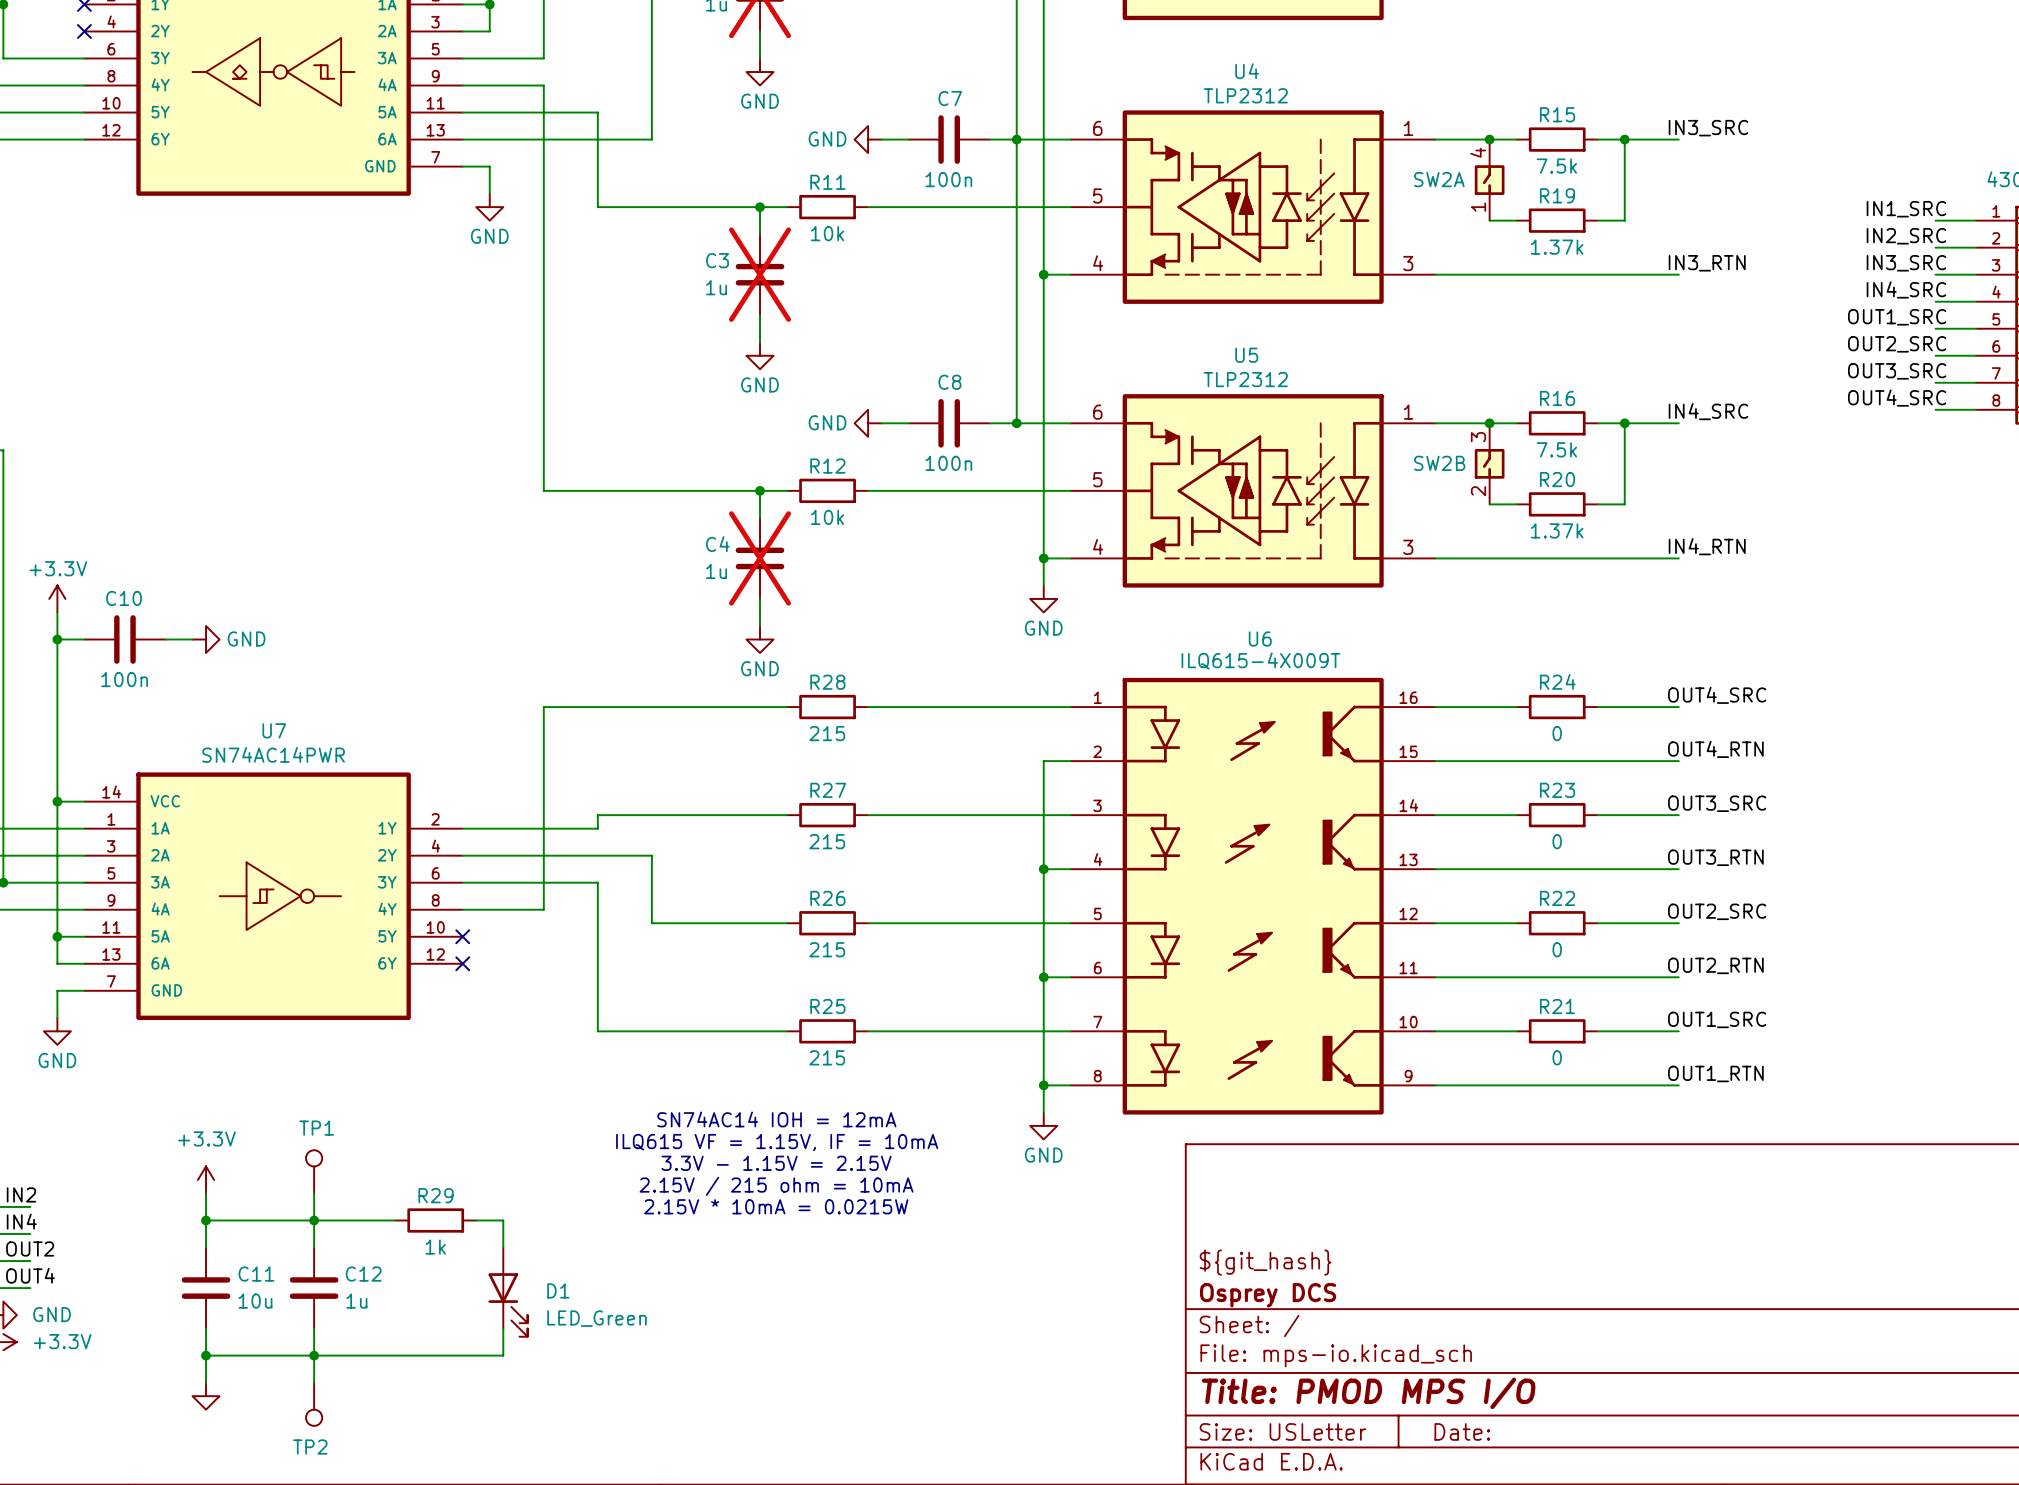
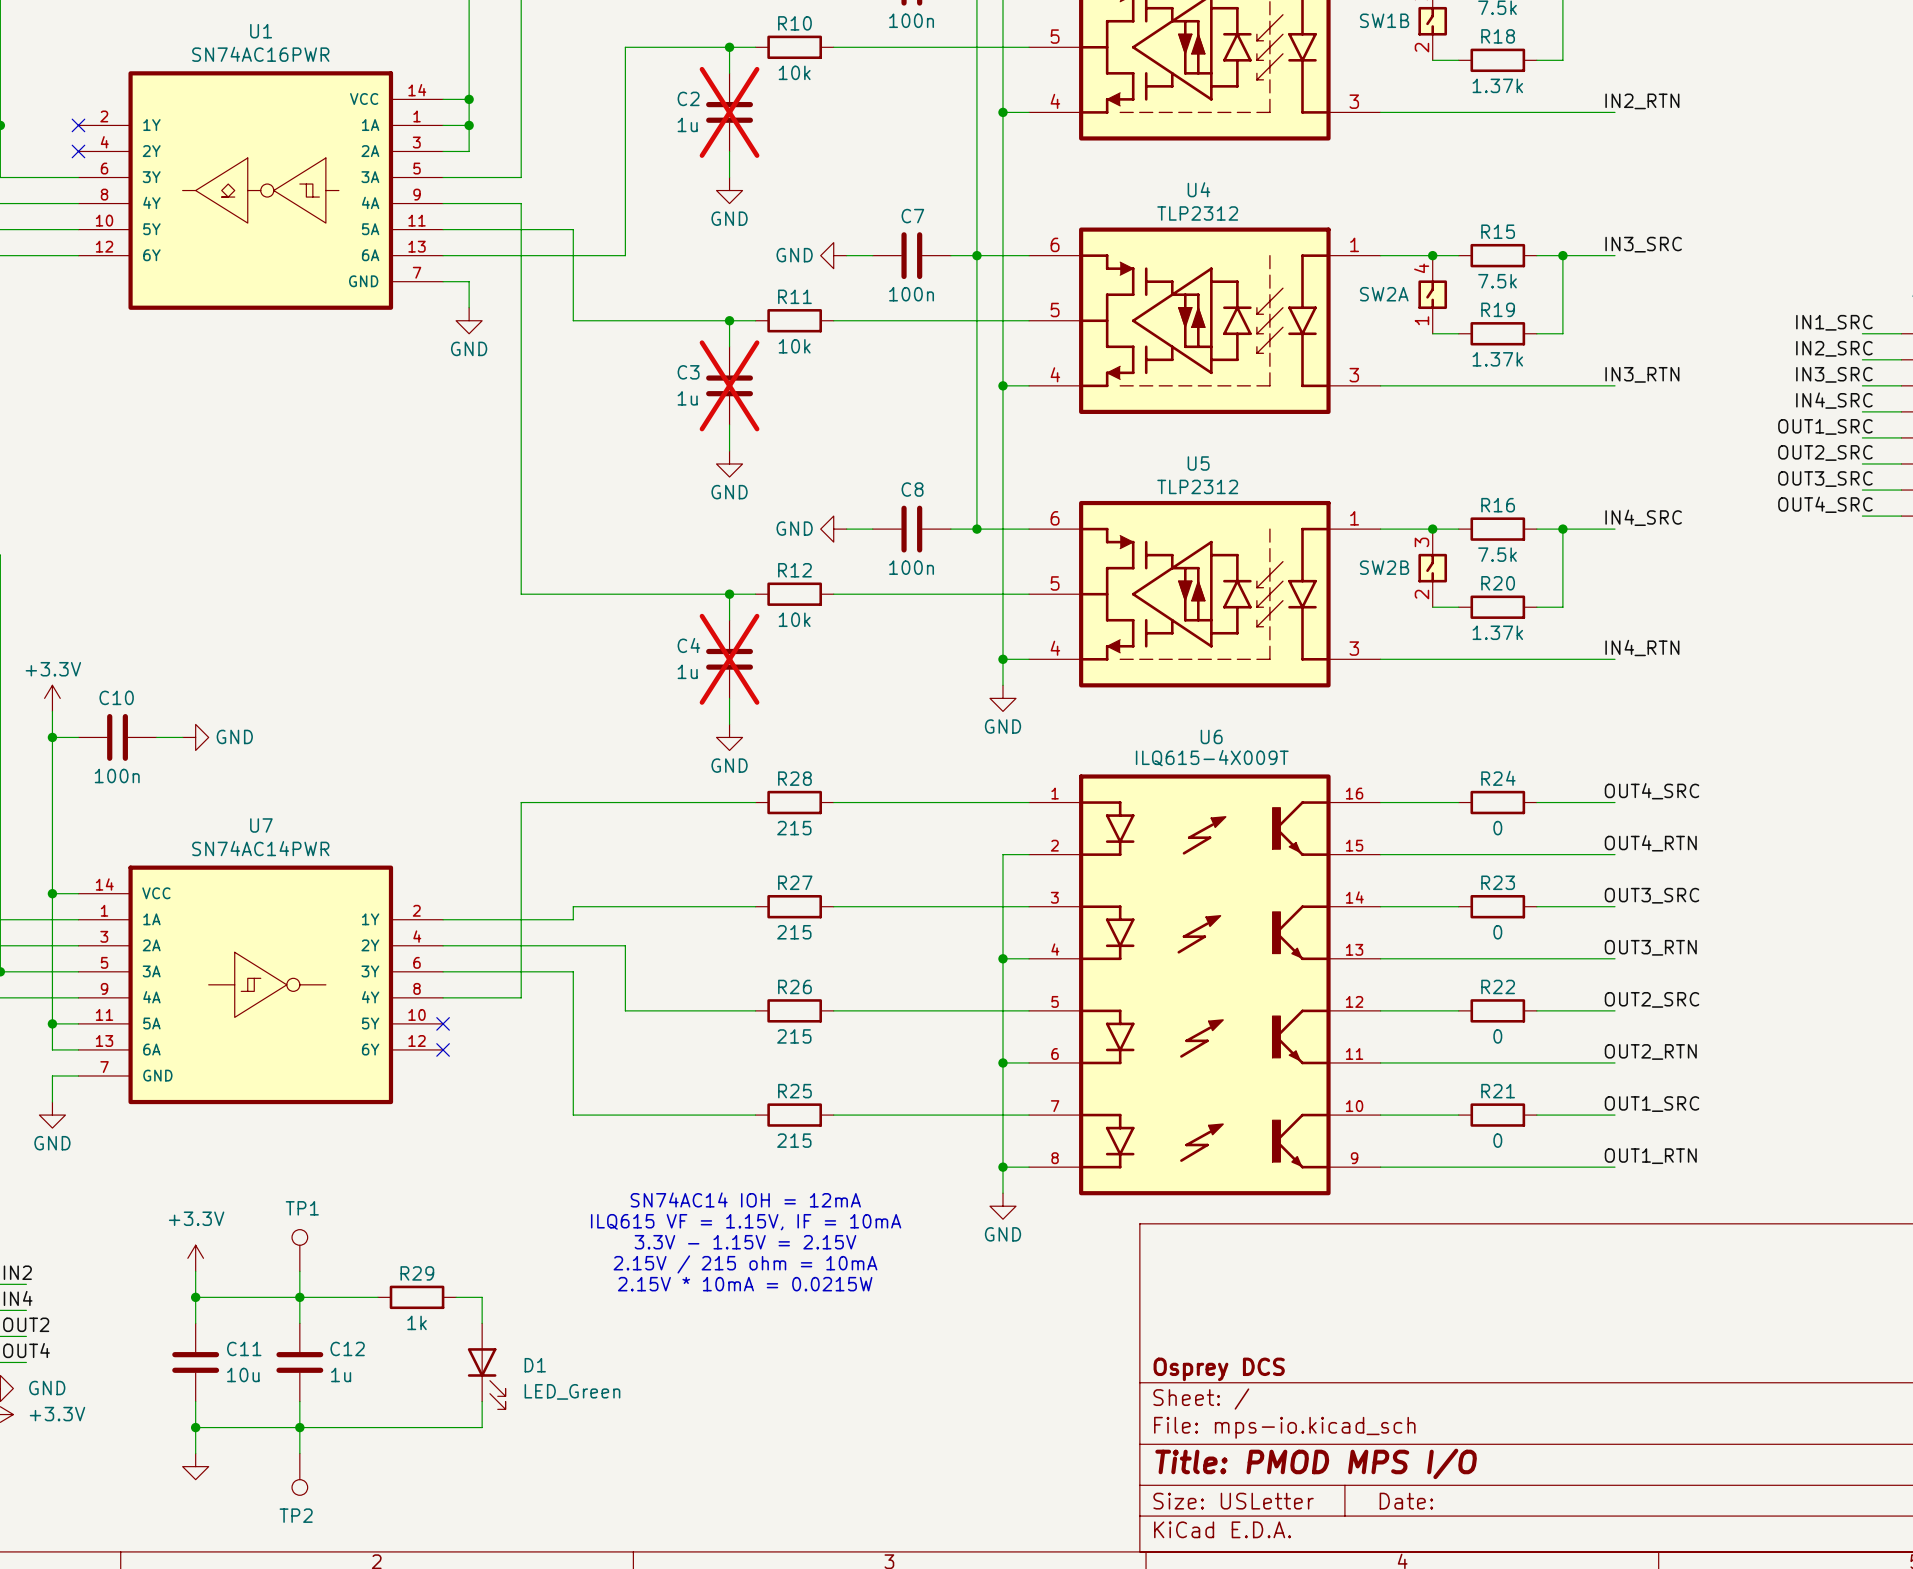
title block: ${git_hash} (1265, 1262) -> none

